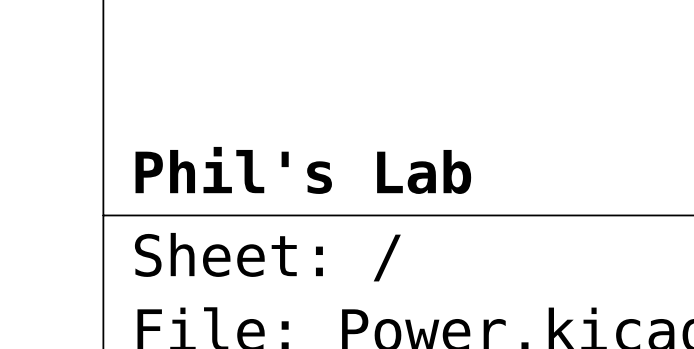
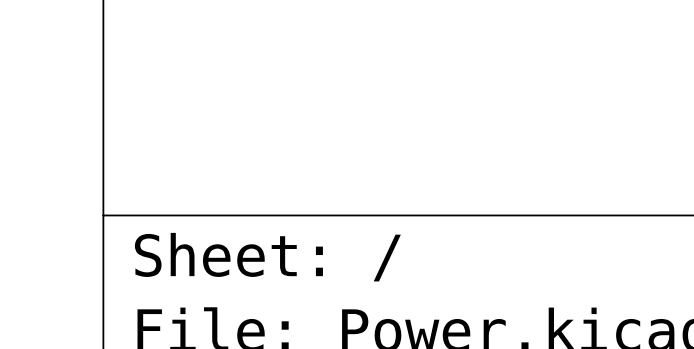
title block: Phil's Lab (303, 170) -> none

